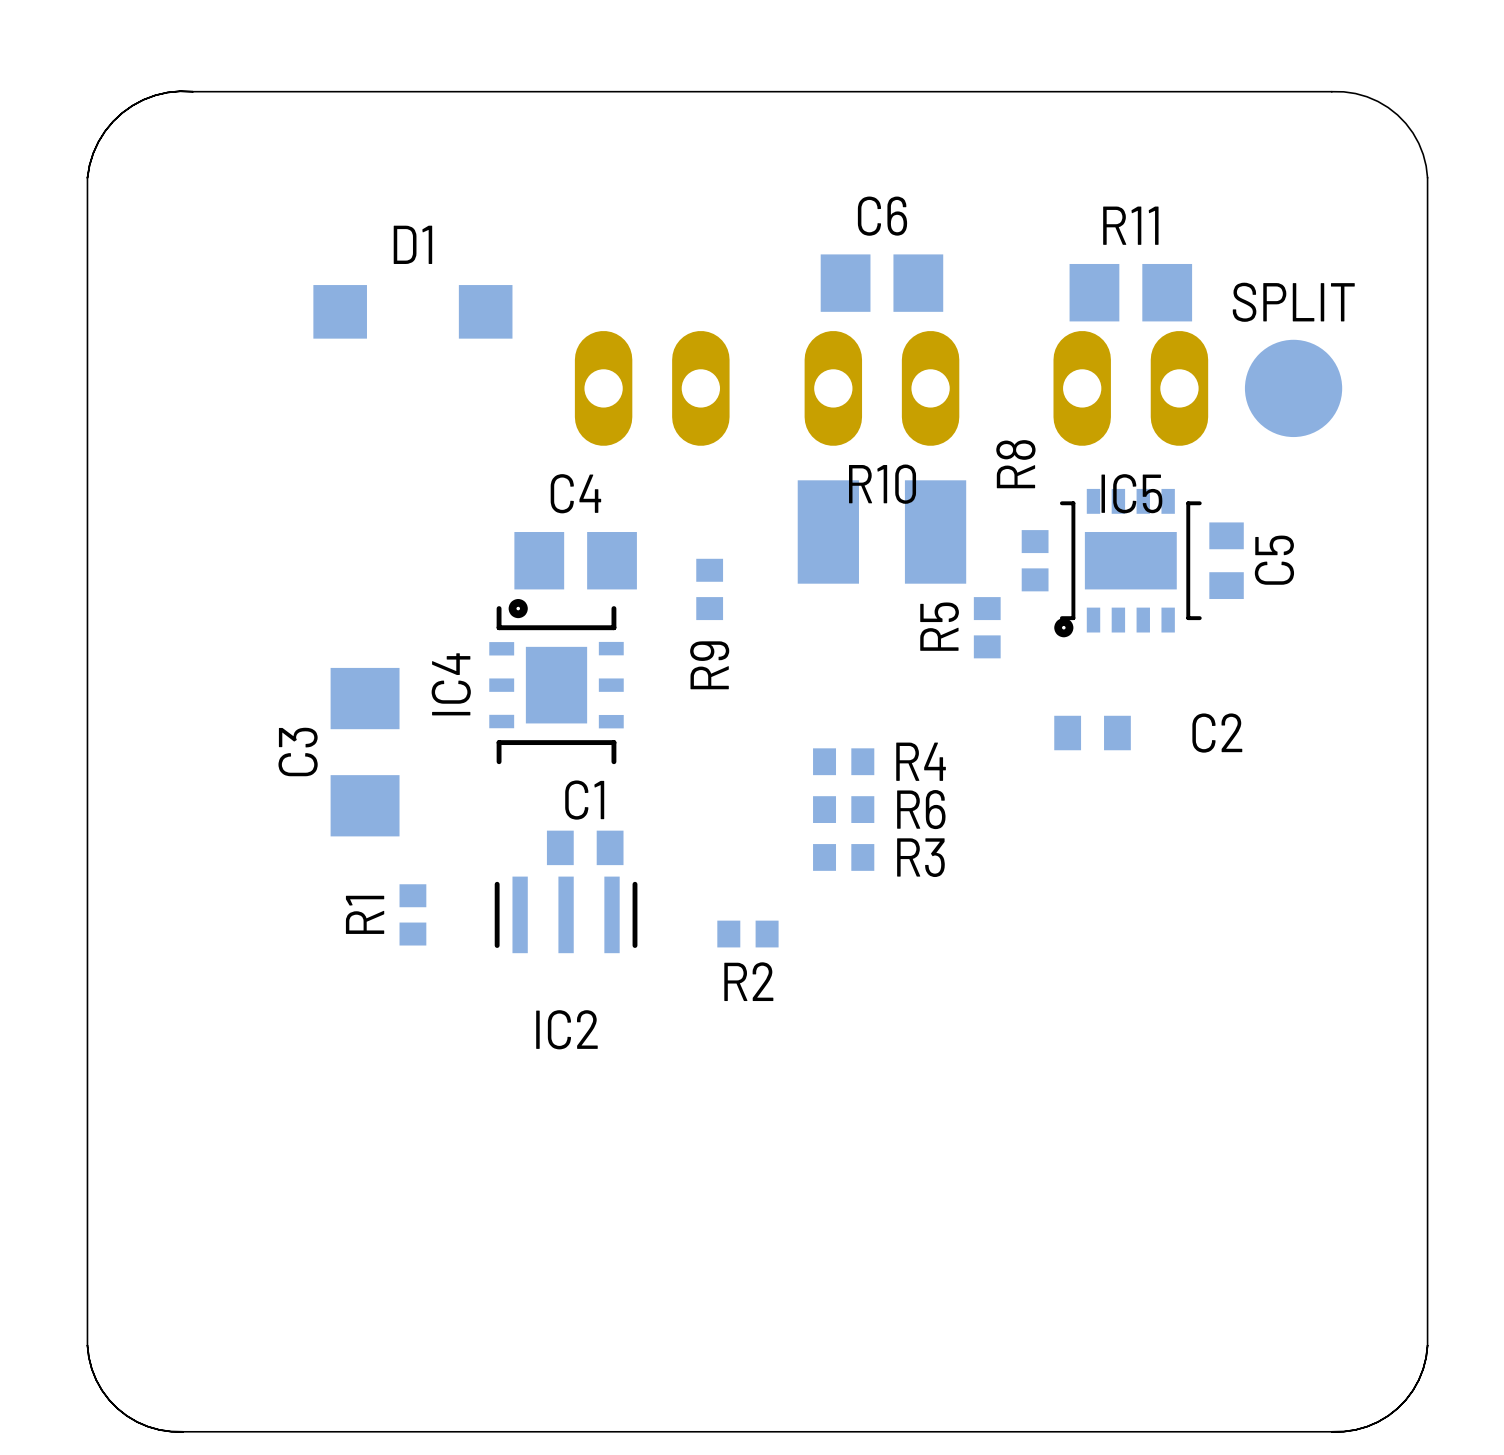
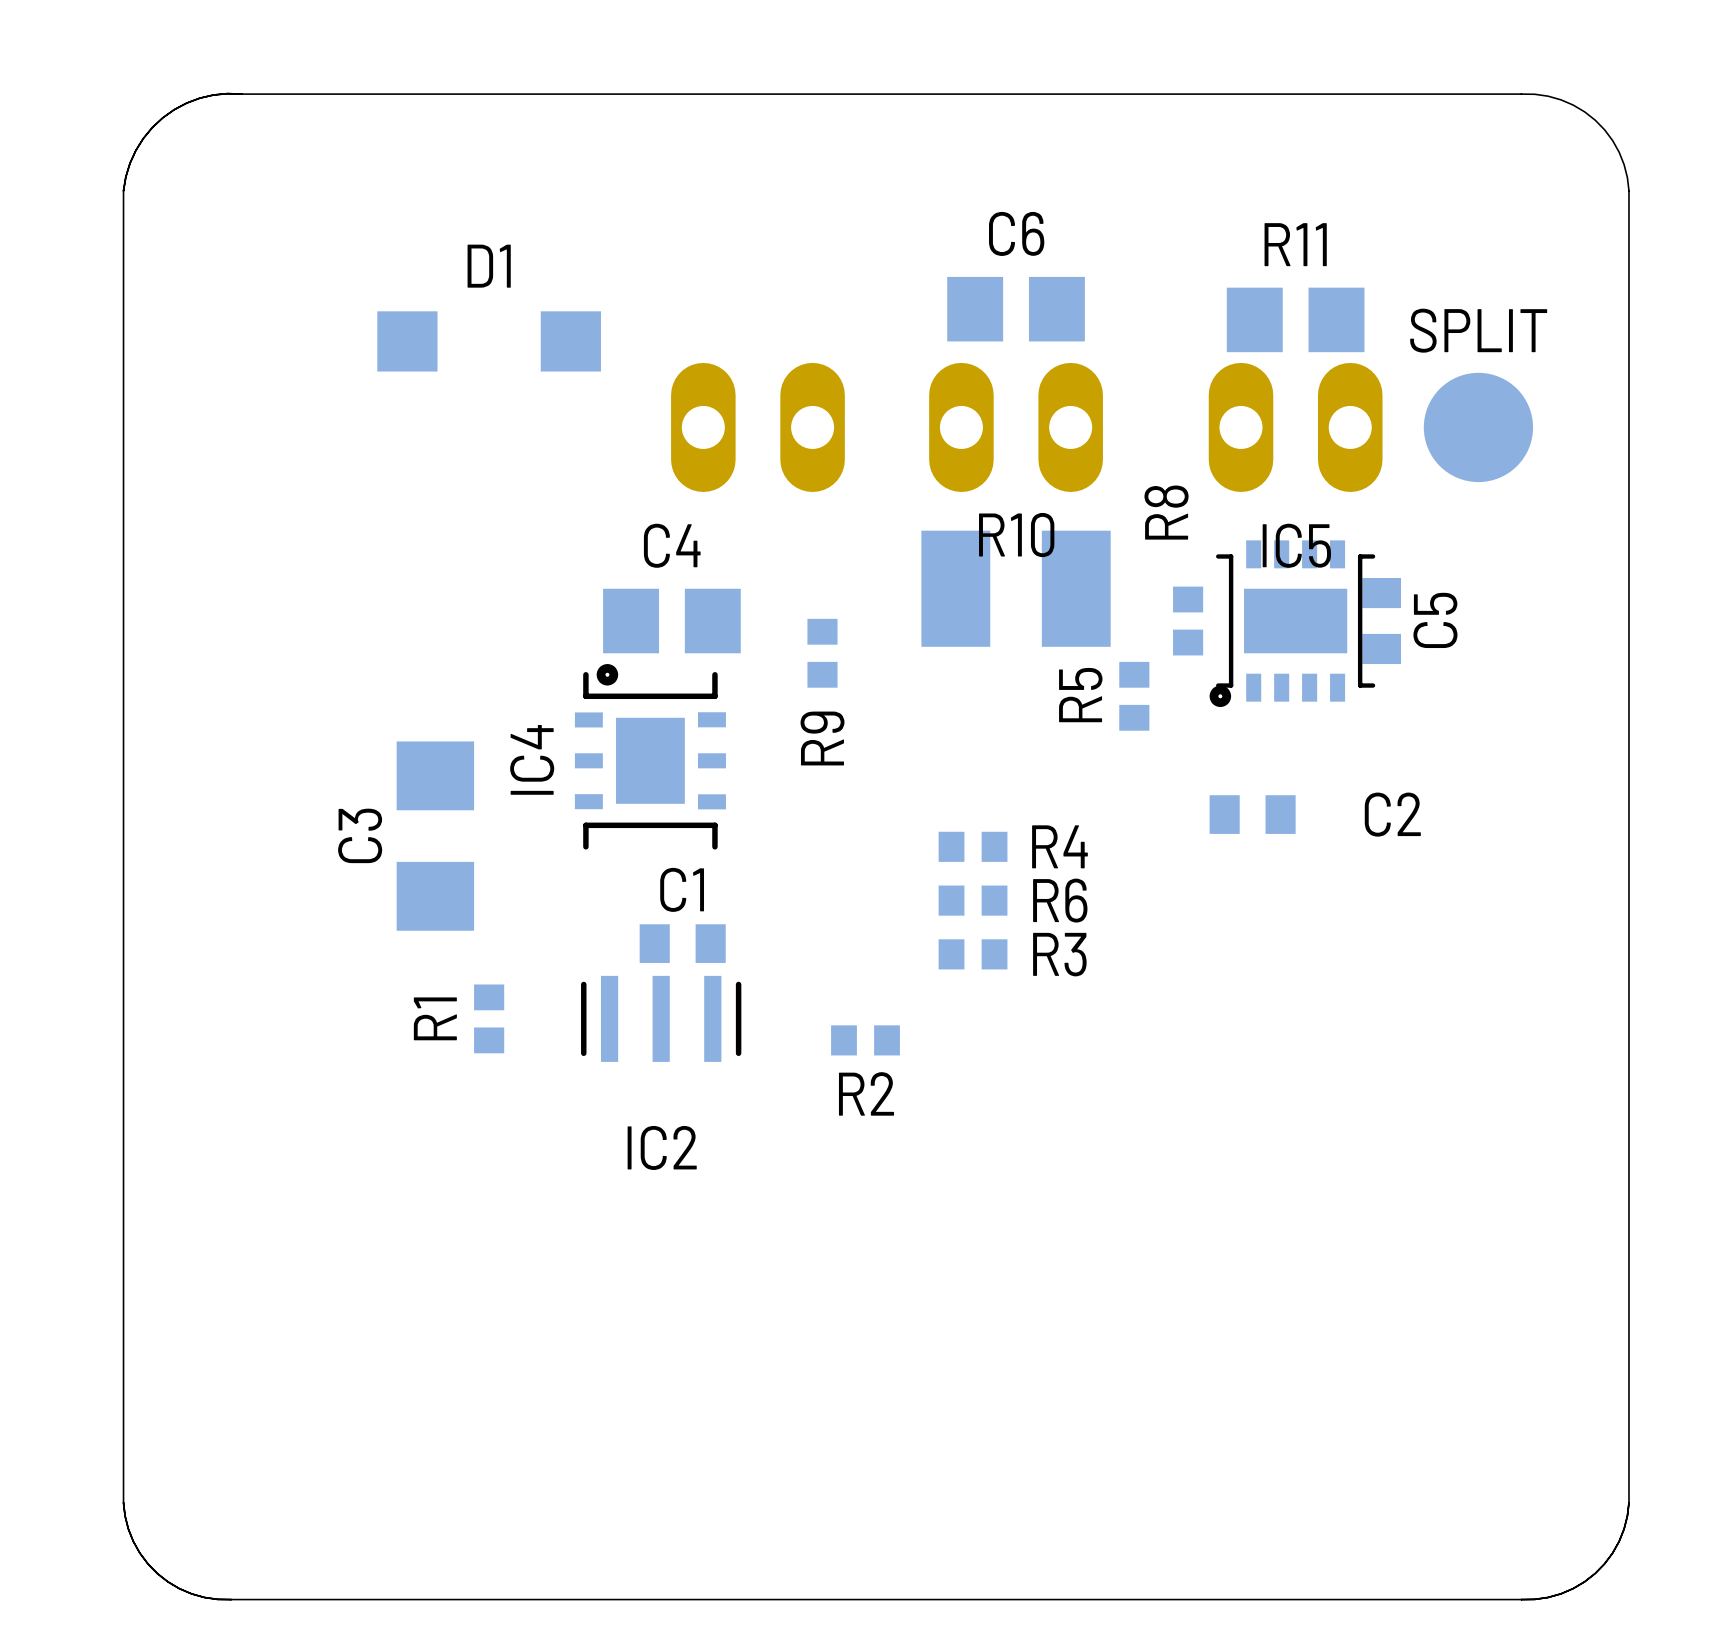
C5 position: (1226, 560) -> (1381, 621)

